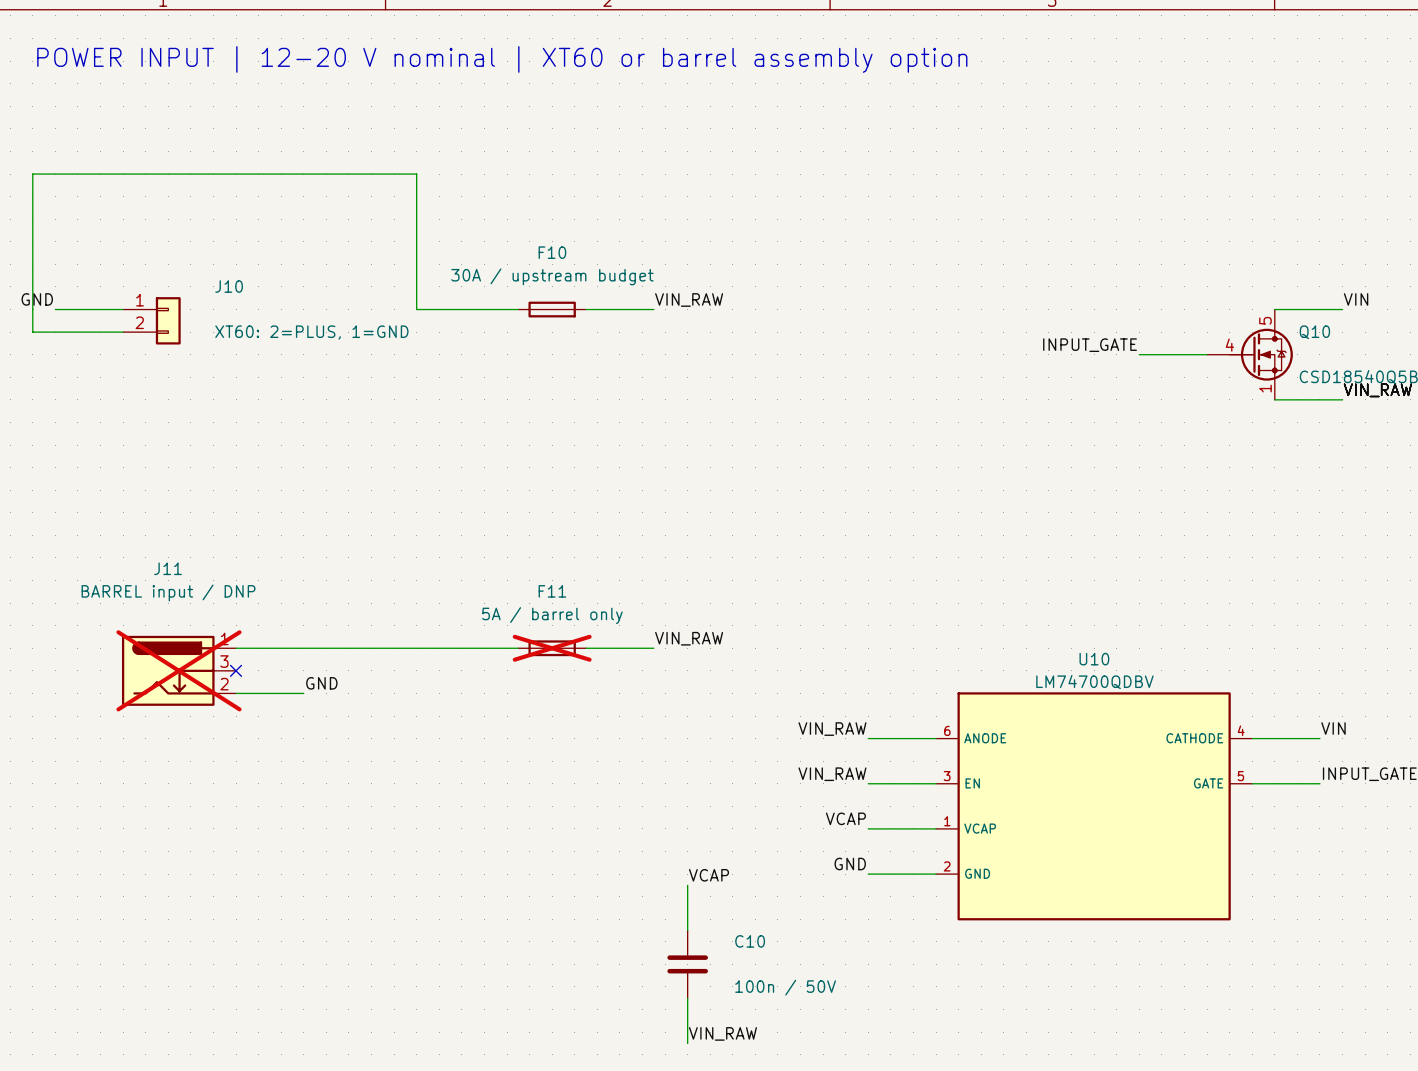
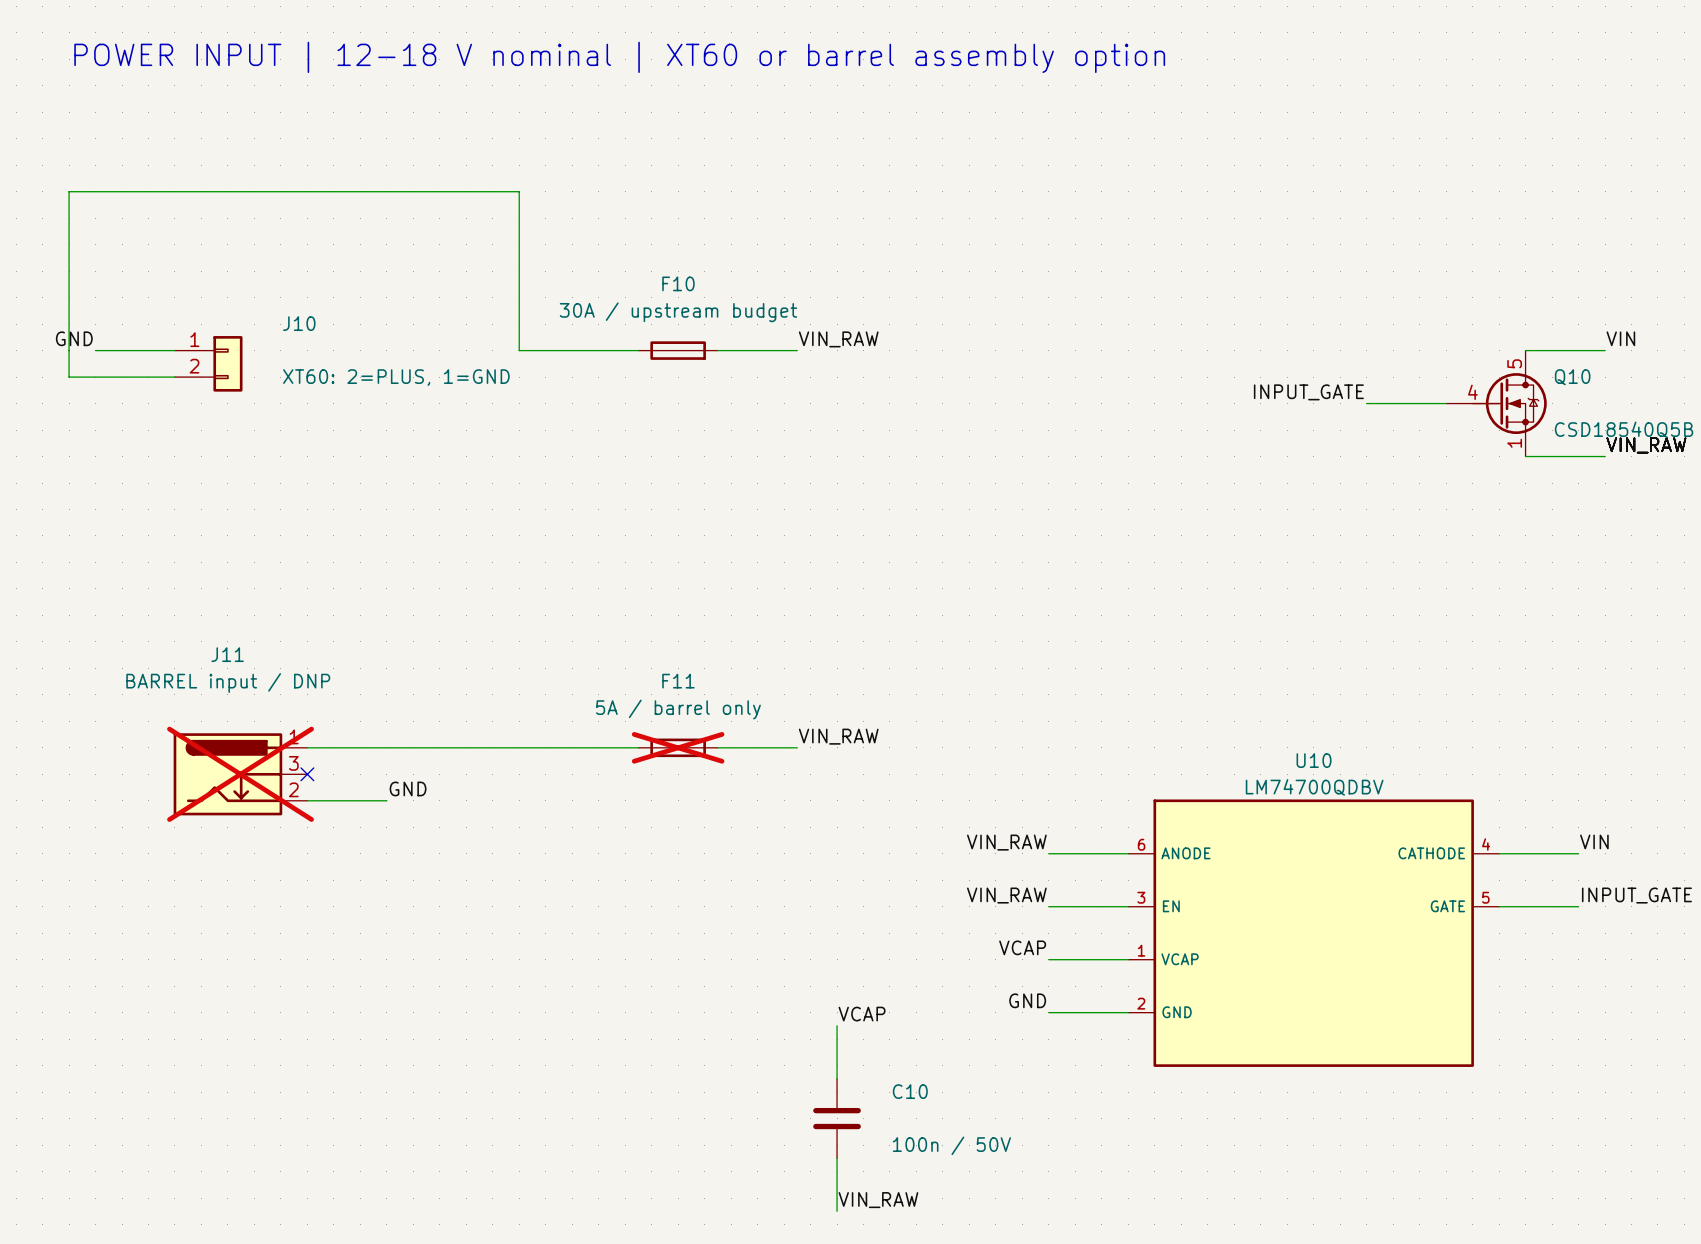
text: POWER INPUT | 12-20 V nominal | XT60 or barrel assembly option (502, 59) -> POWER INPUT | 12-18 V nominal | XT60 or barrel assembly option (619, 57)

